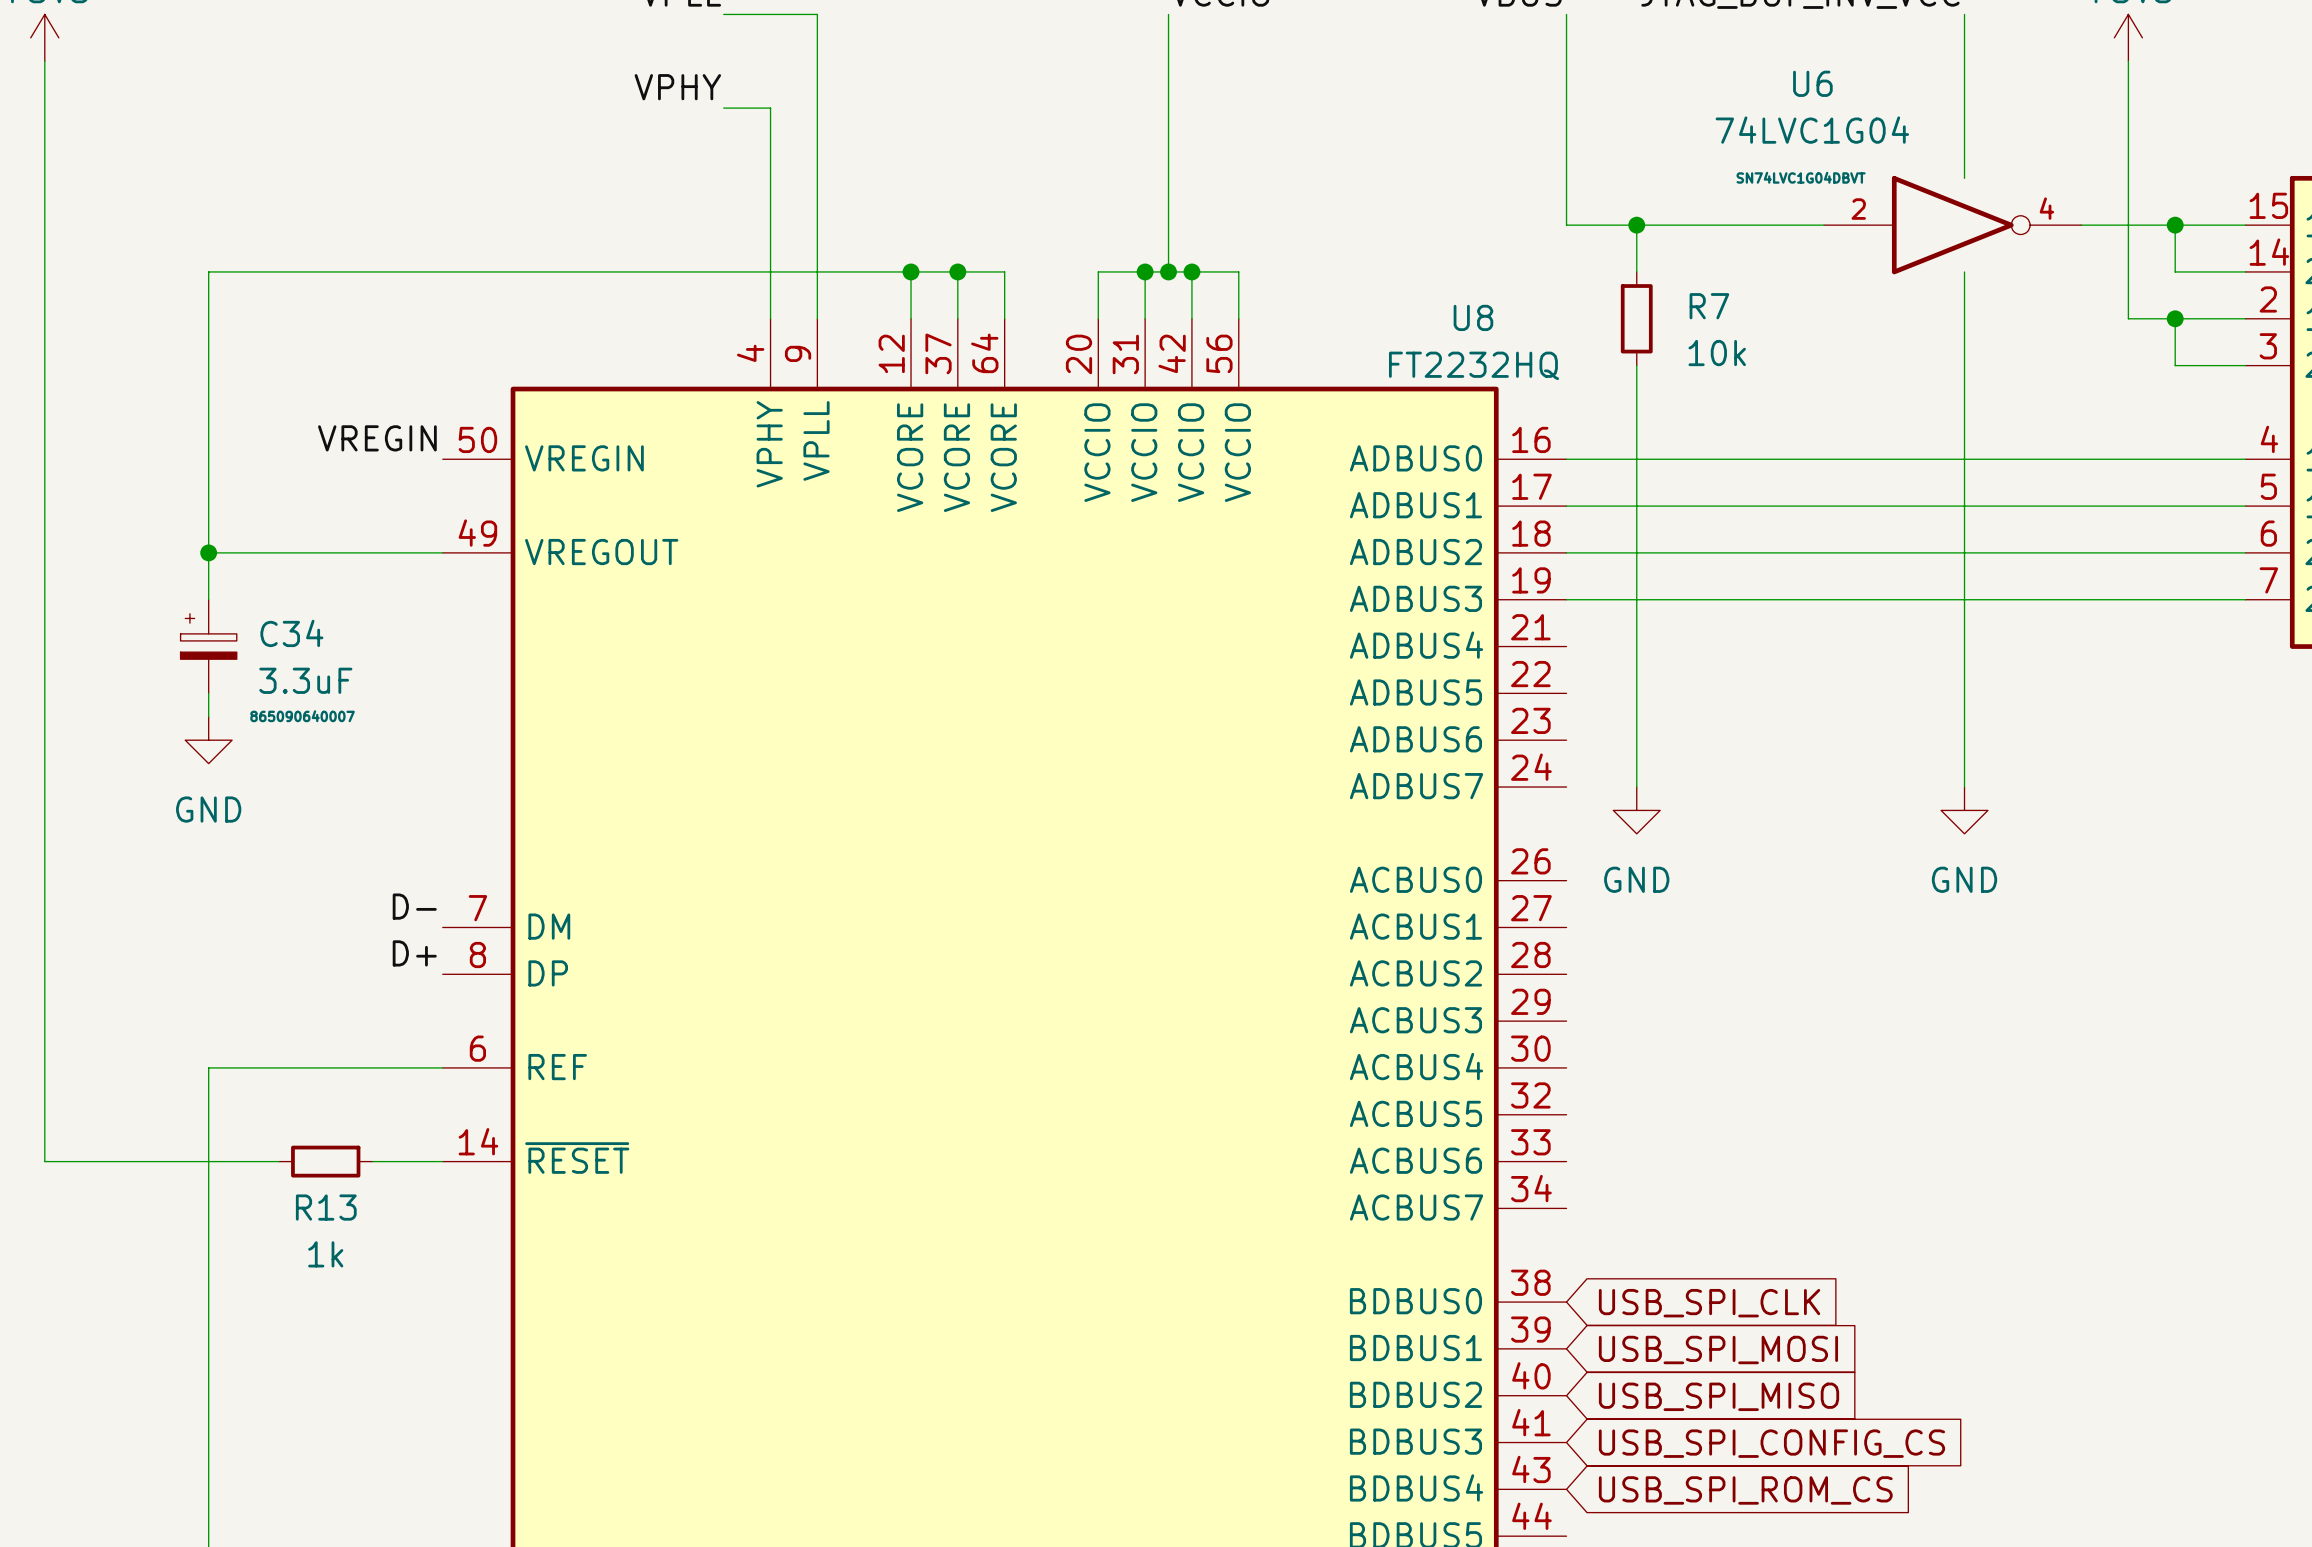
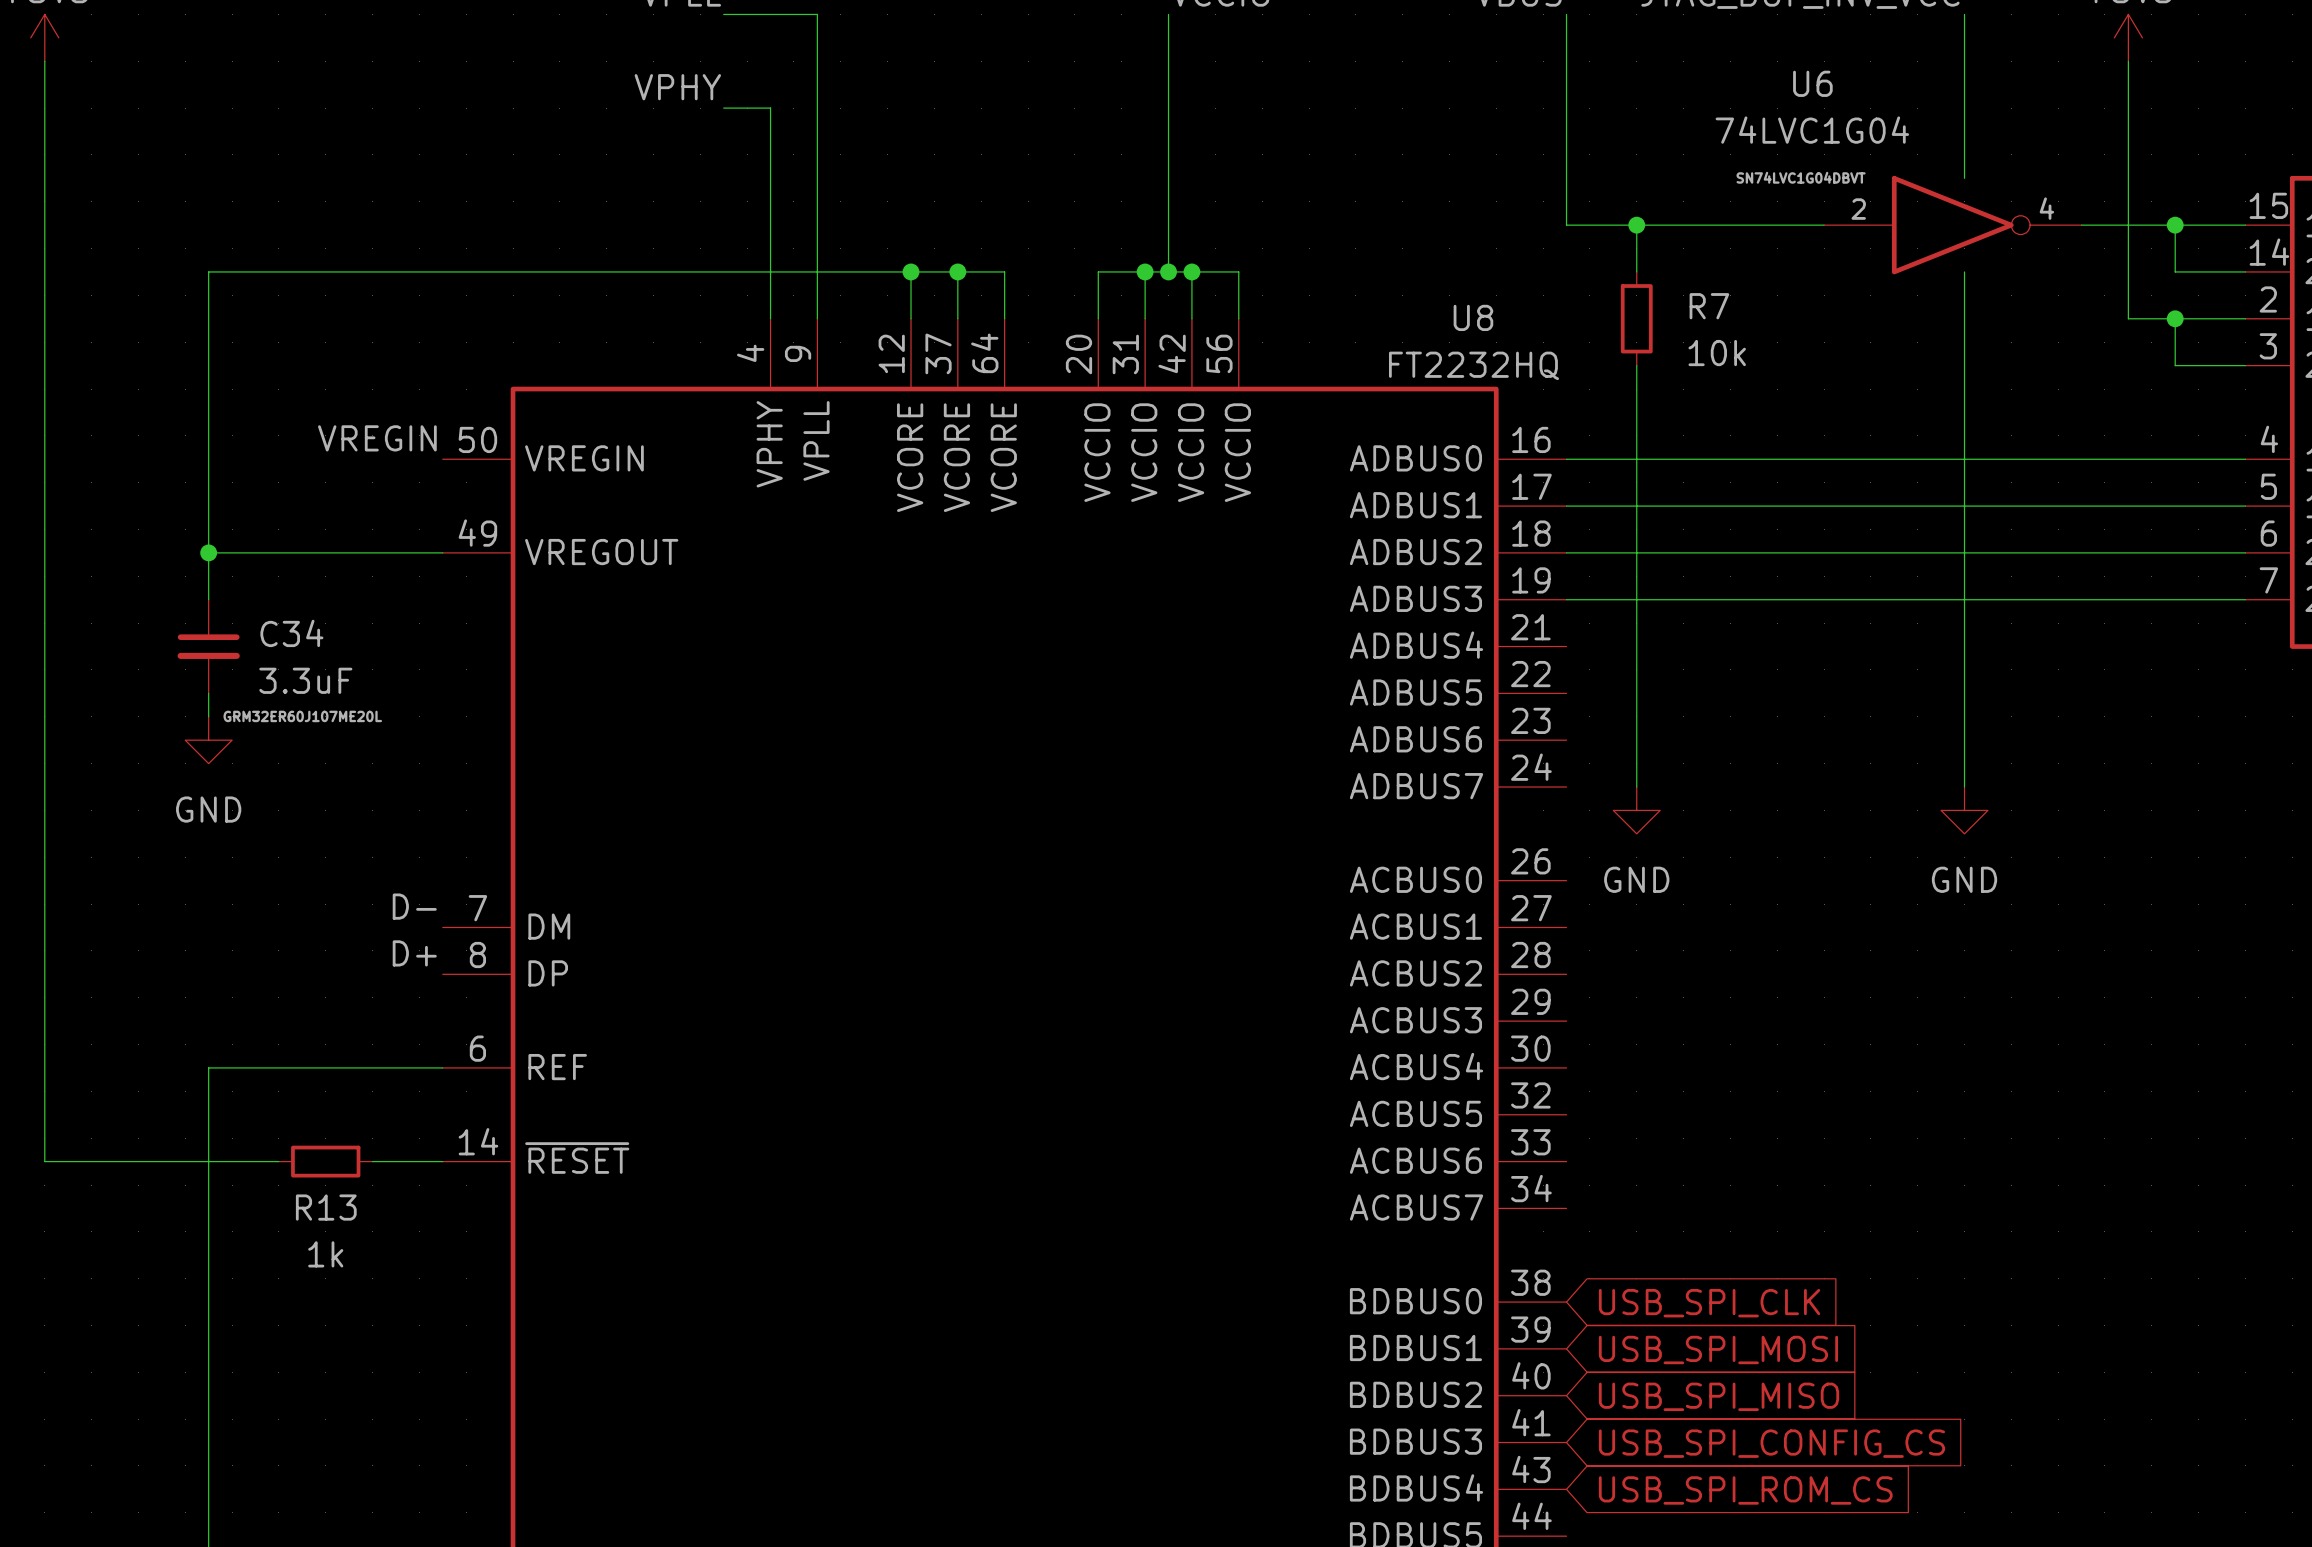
C34 symbol: [180, 599, 237, 694] -> [177, 599, 240, 694]
C34 text: 865090640007 (302, 716) -> GRM32ER60J107ME20L (302, 716)

